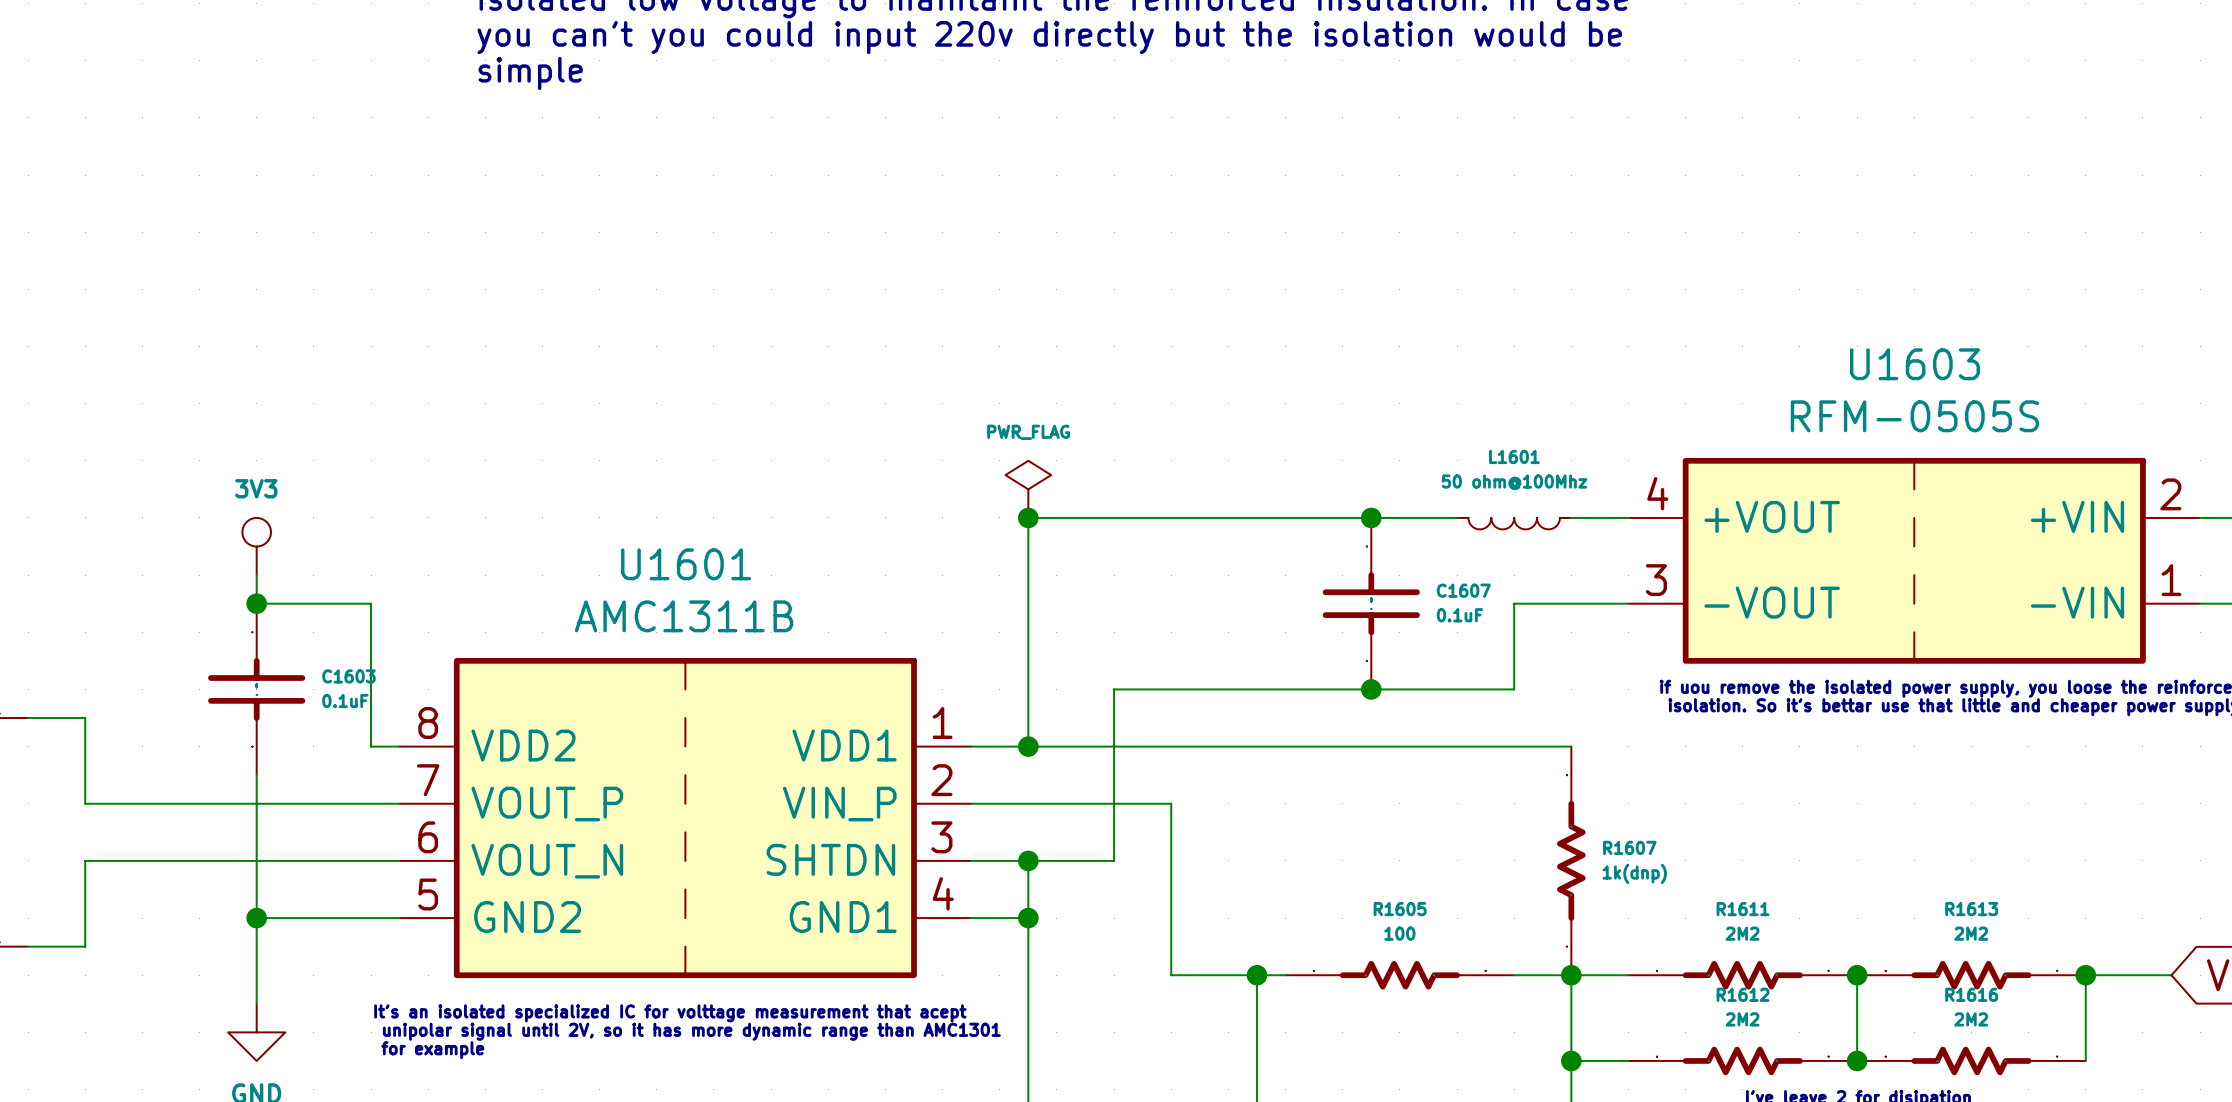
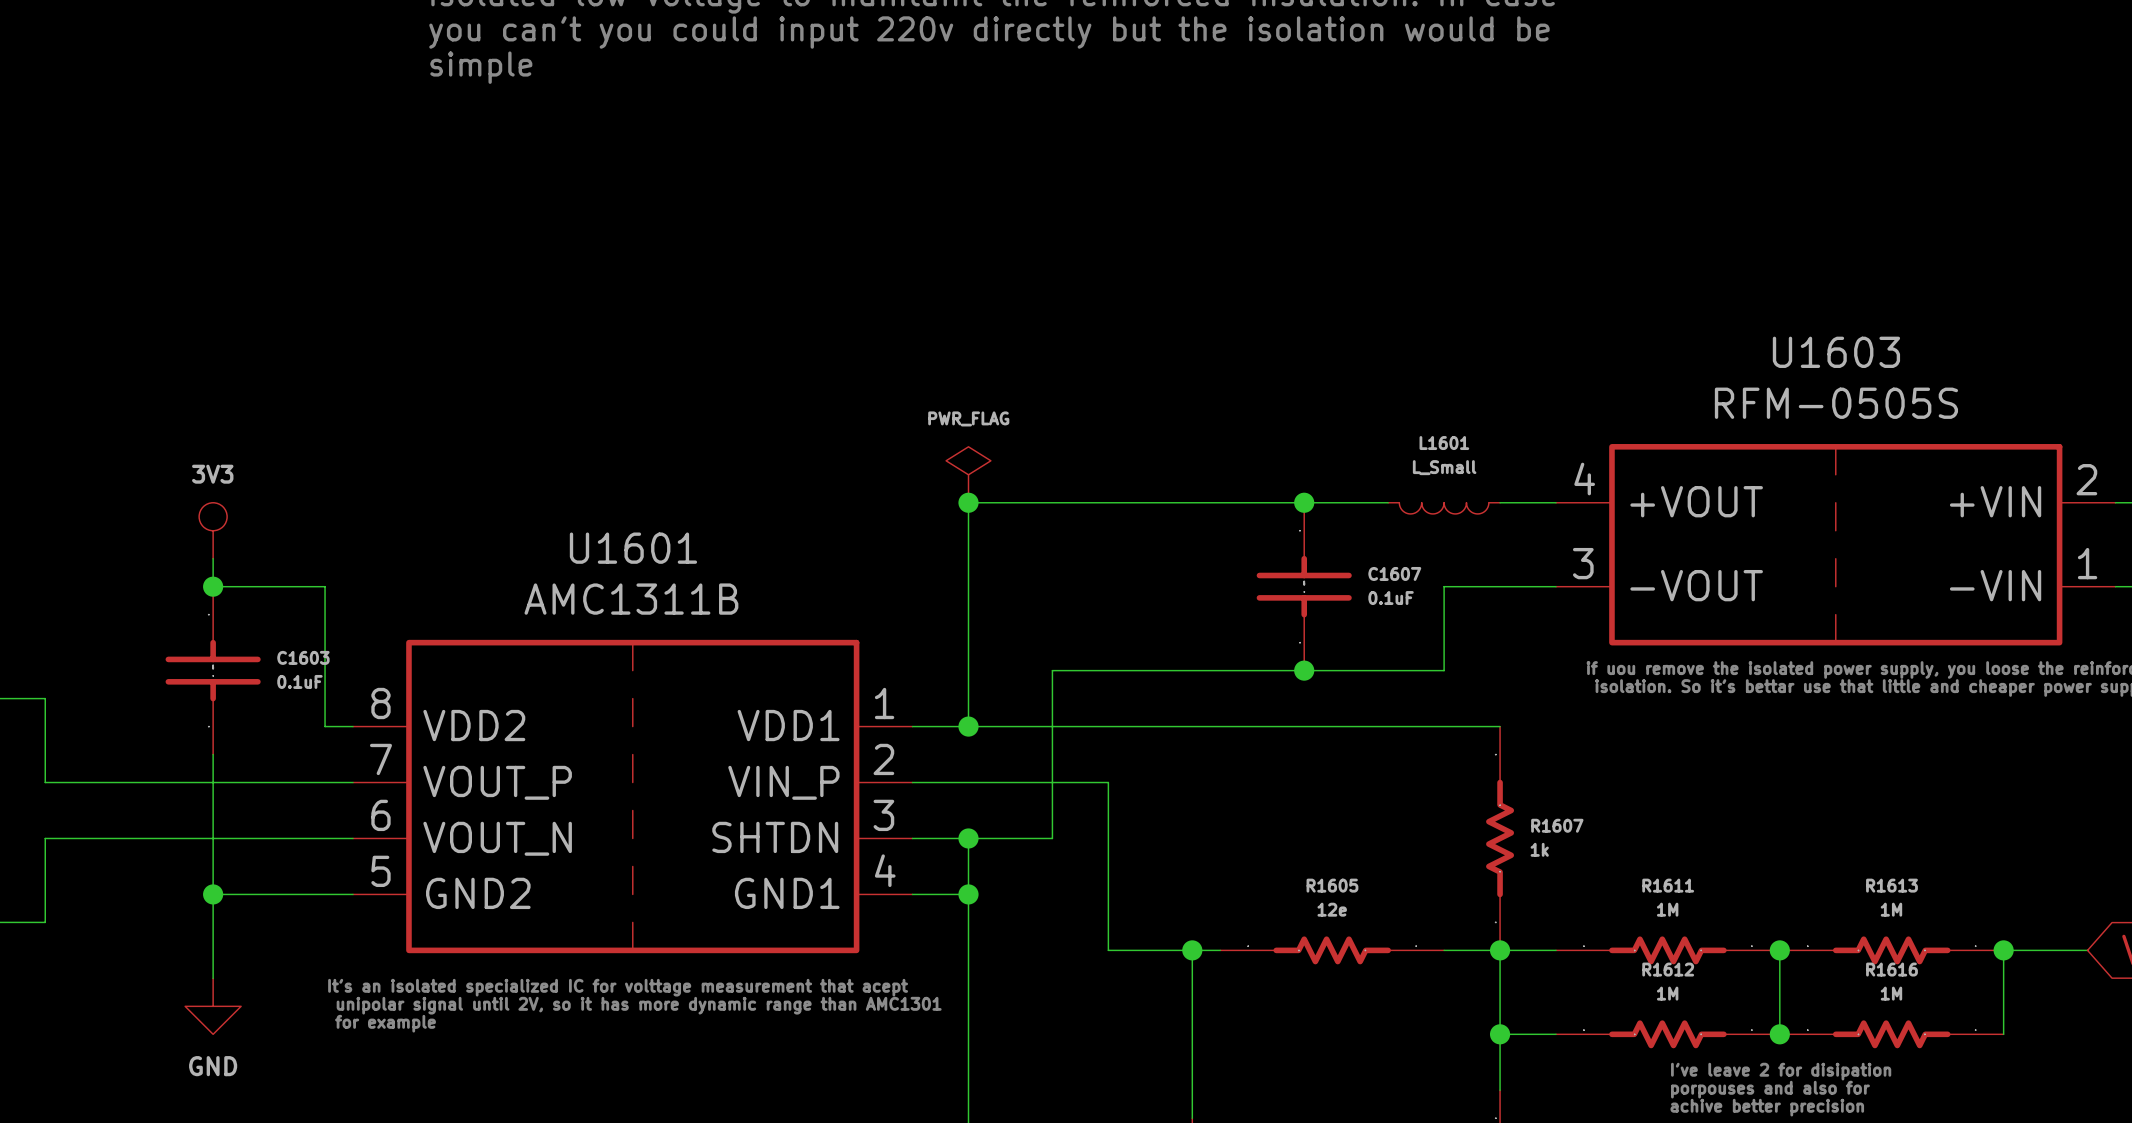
L1601 value: 50 ohm@100Mhz (1514, 482) -> L_Small (1444, 467)
R1607 value: 1k(dnp) (1634, 873) -> 1k (1539, 849)
R1605 value: 100 (1399, 933) -> 12e (1332, 909)
R1611 value: 2M2 (1742, 933) -> 1M (1667, 909)
R1613 value: 2M2 (1971, 933) -> 1M (1891, 909)
R1612 value: 2M2 (1742, 1019) -> 1M (1667, 993)
R1616 value: 2M2 (1971, 1019) -> 1M (1891, 993)

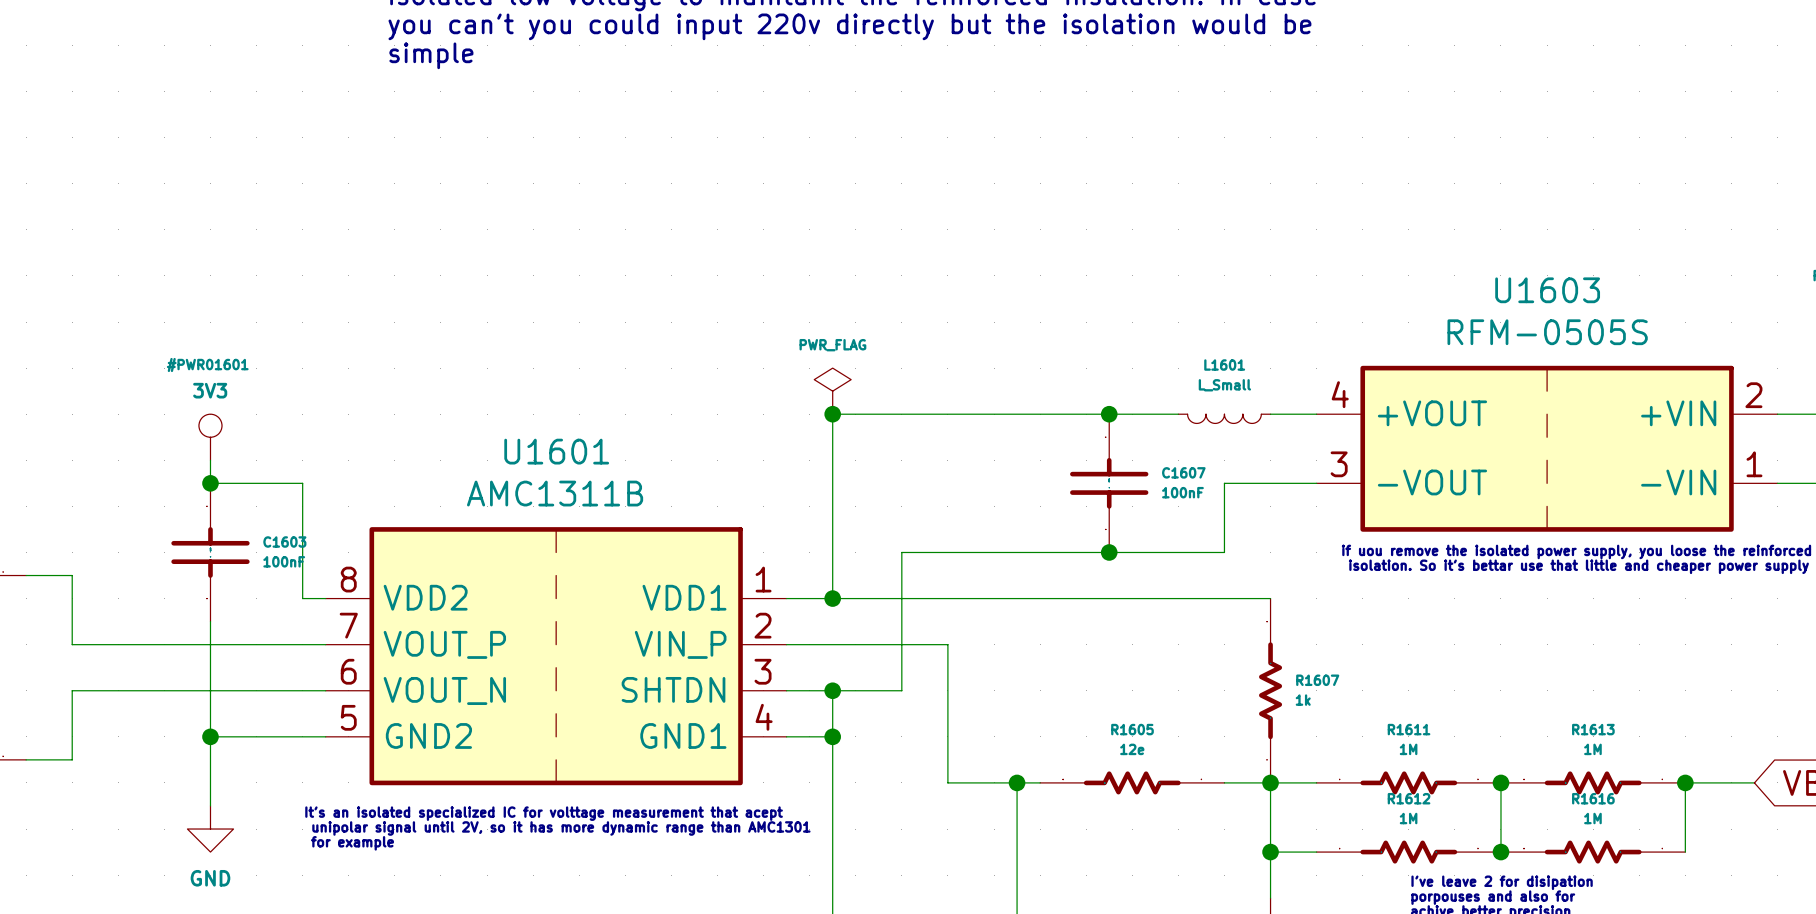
#PWR01601 name: none -> #PWR01601 (207, 364)
C1607 value: 0.1uF (1391, 598) -> 100nF (1182, 492)
C1603 value: 0.1uF (299, 681) -> 100nF (284, 561)

